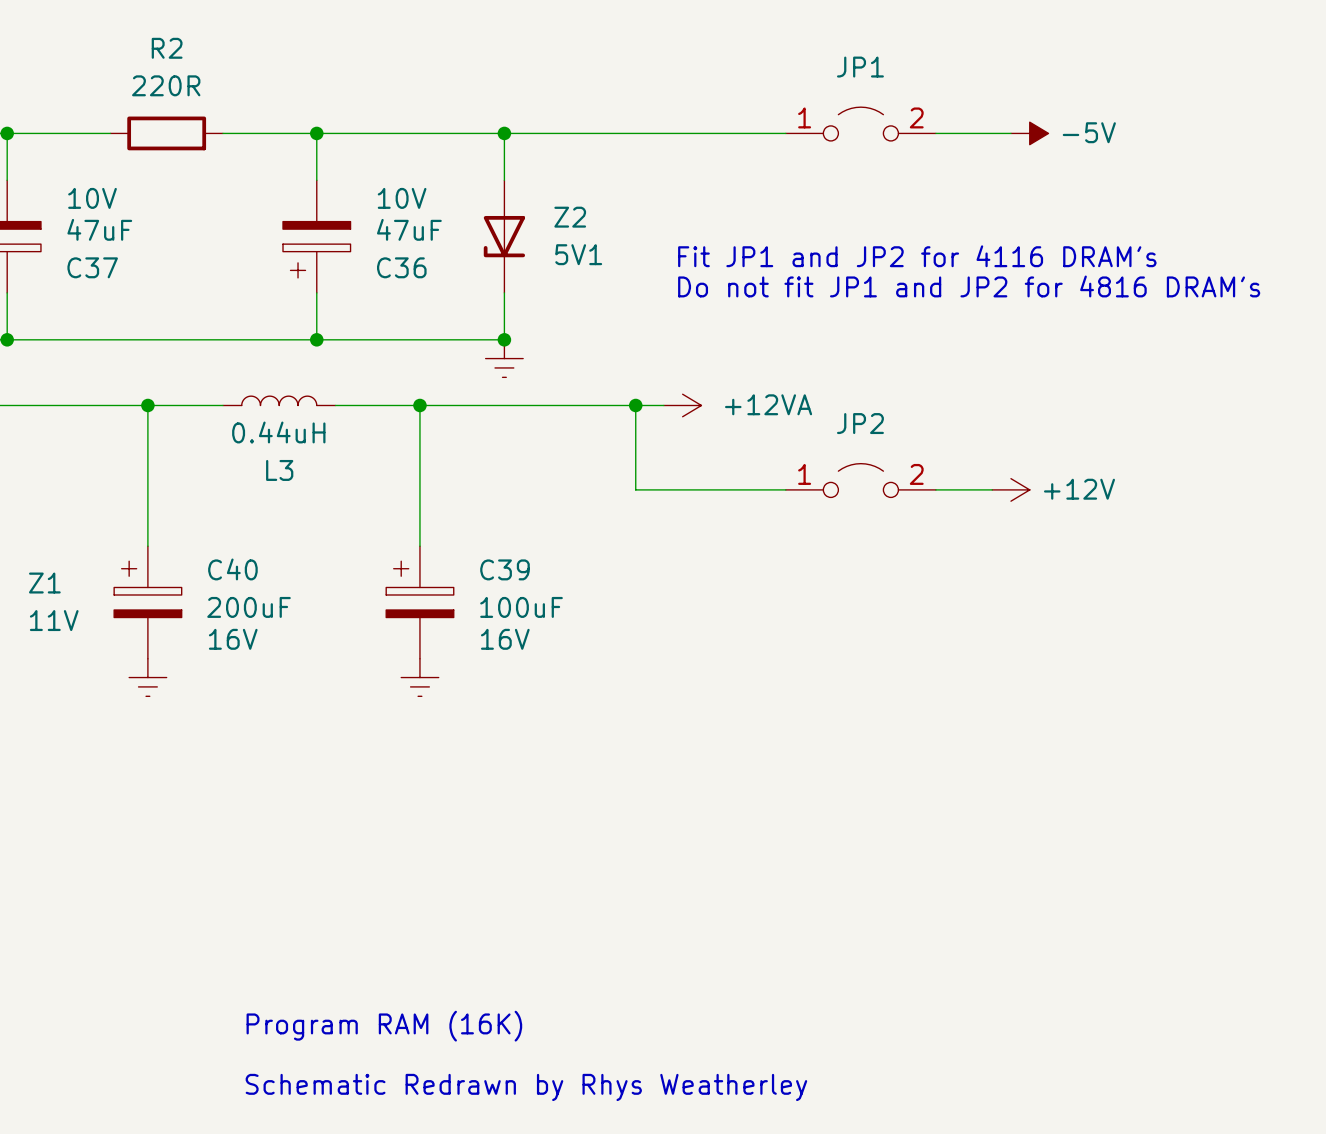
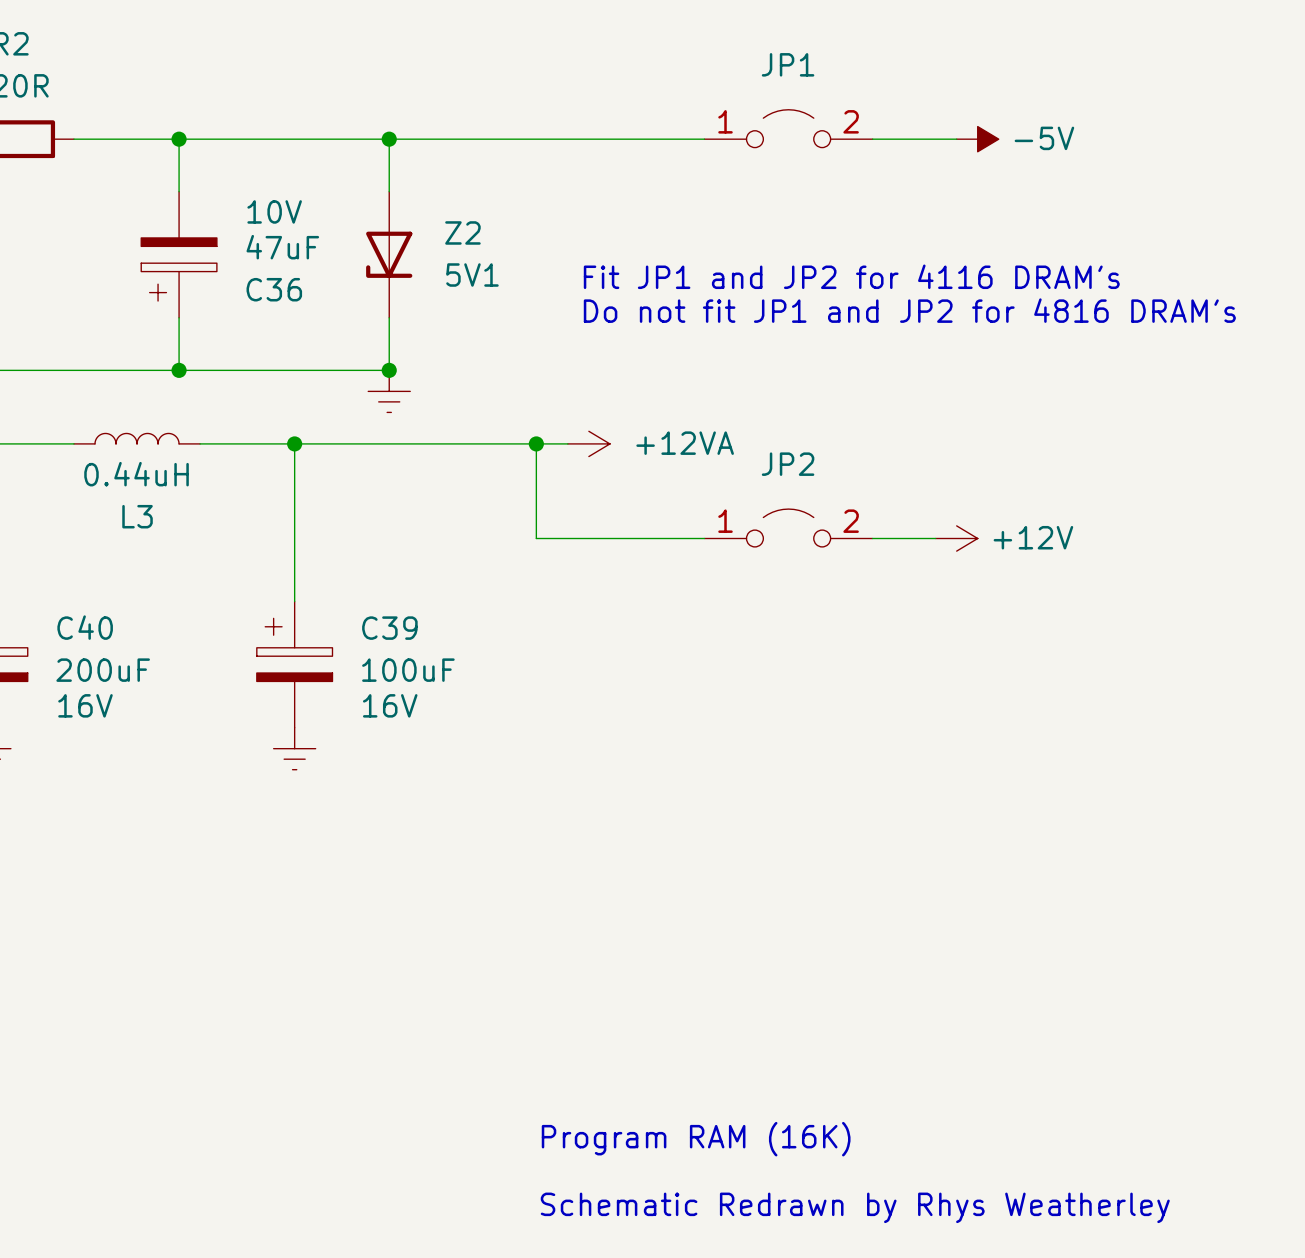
text: Program RAM (16K) (384, 1026) -> none
text: none -> Program RAM (16K) (696, 1139)
text: Schematic Redrawn by Rhys Weatherley (526, 1087) -> none
text: none -> Schematic Redrawn by Rhys Weatherley (855, 1207)

